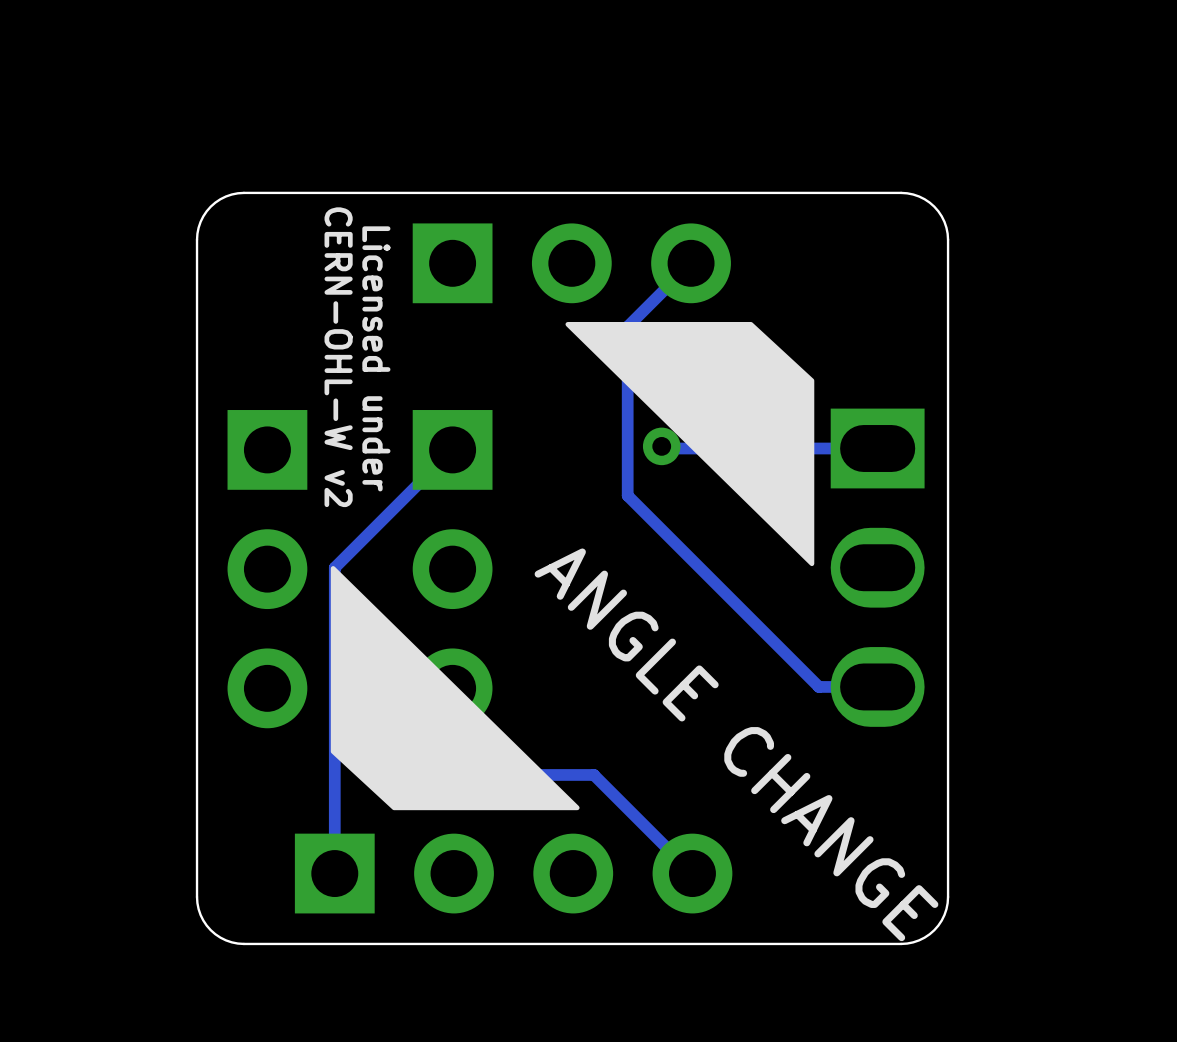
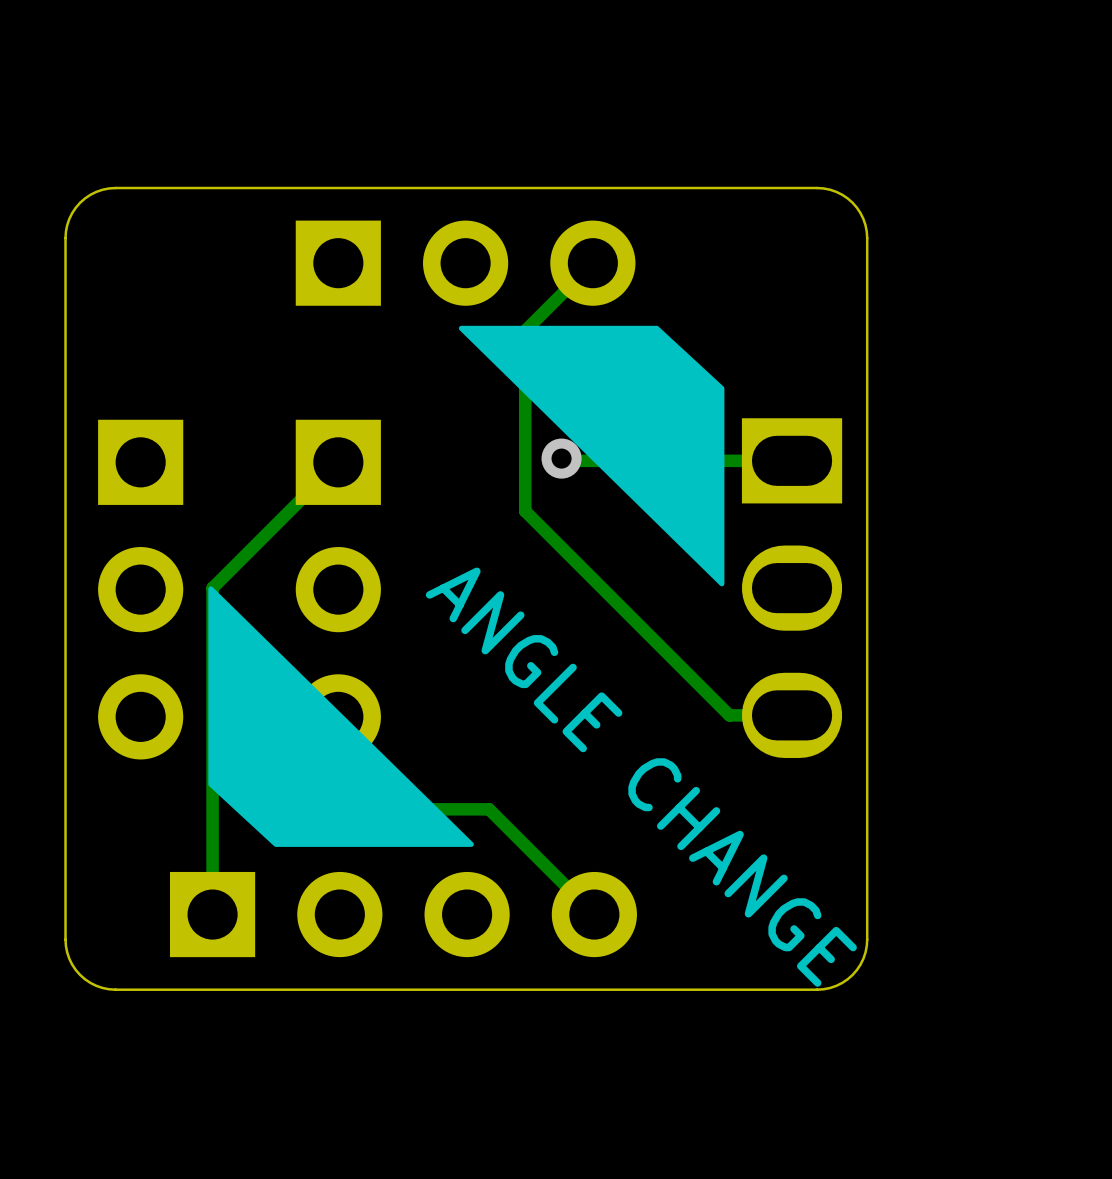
text: CERN-OHL-W v2 (338, 357) -> none
text: Licensed under (376, 358) -> none

